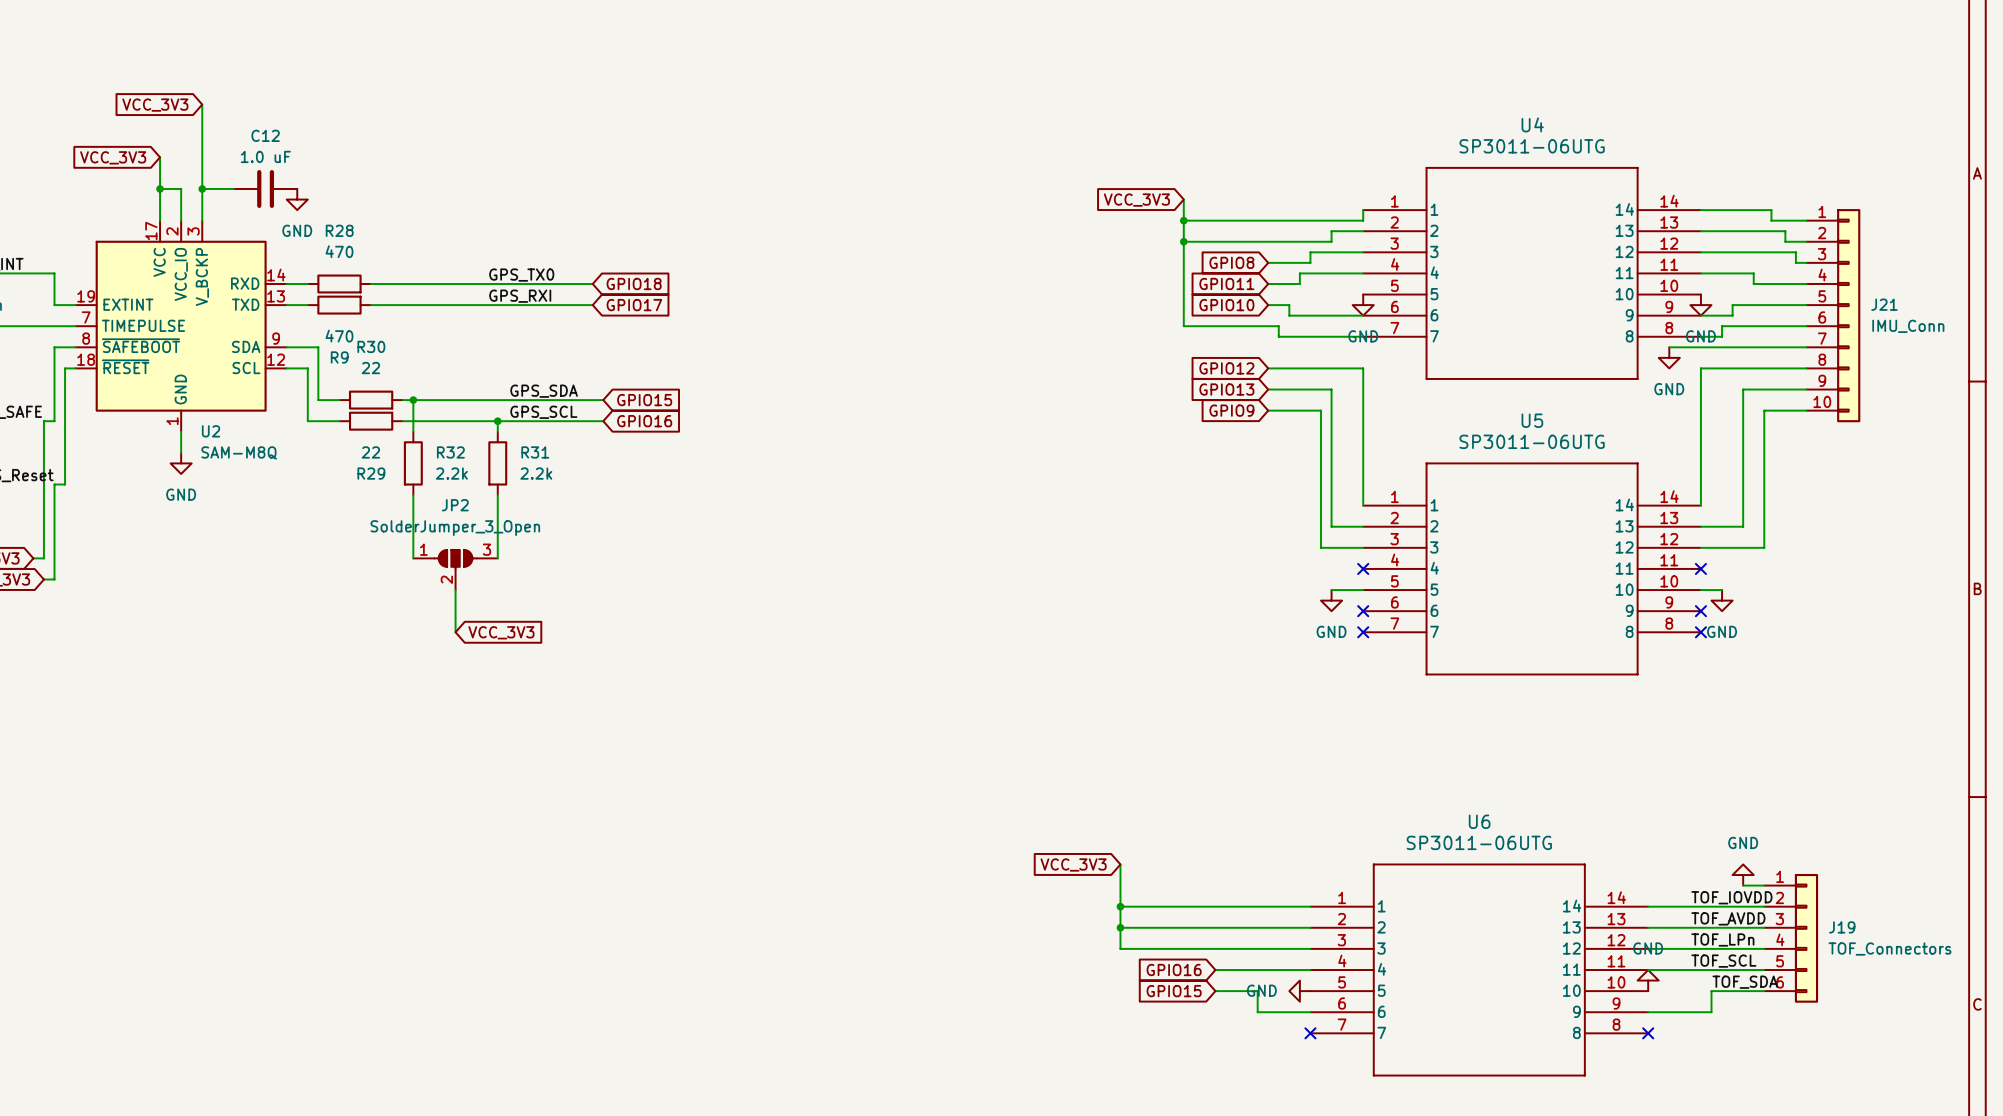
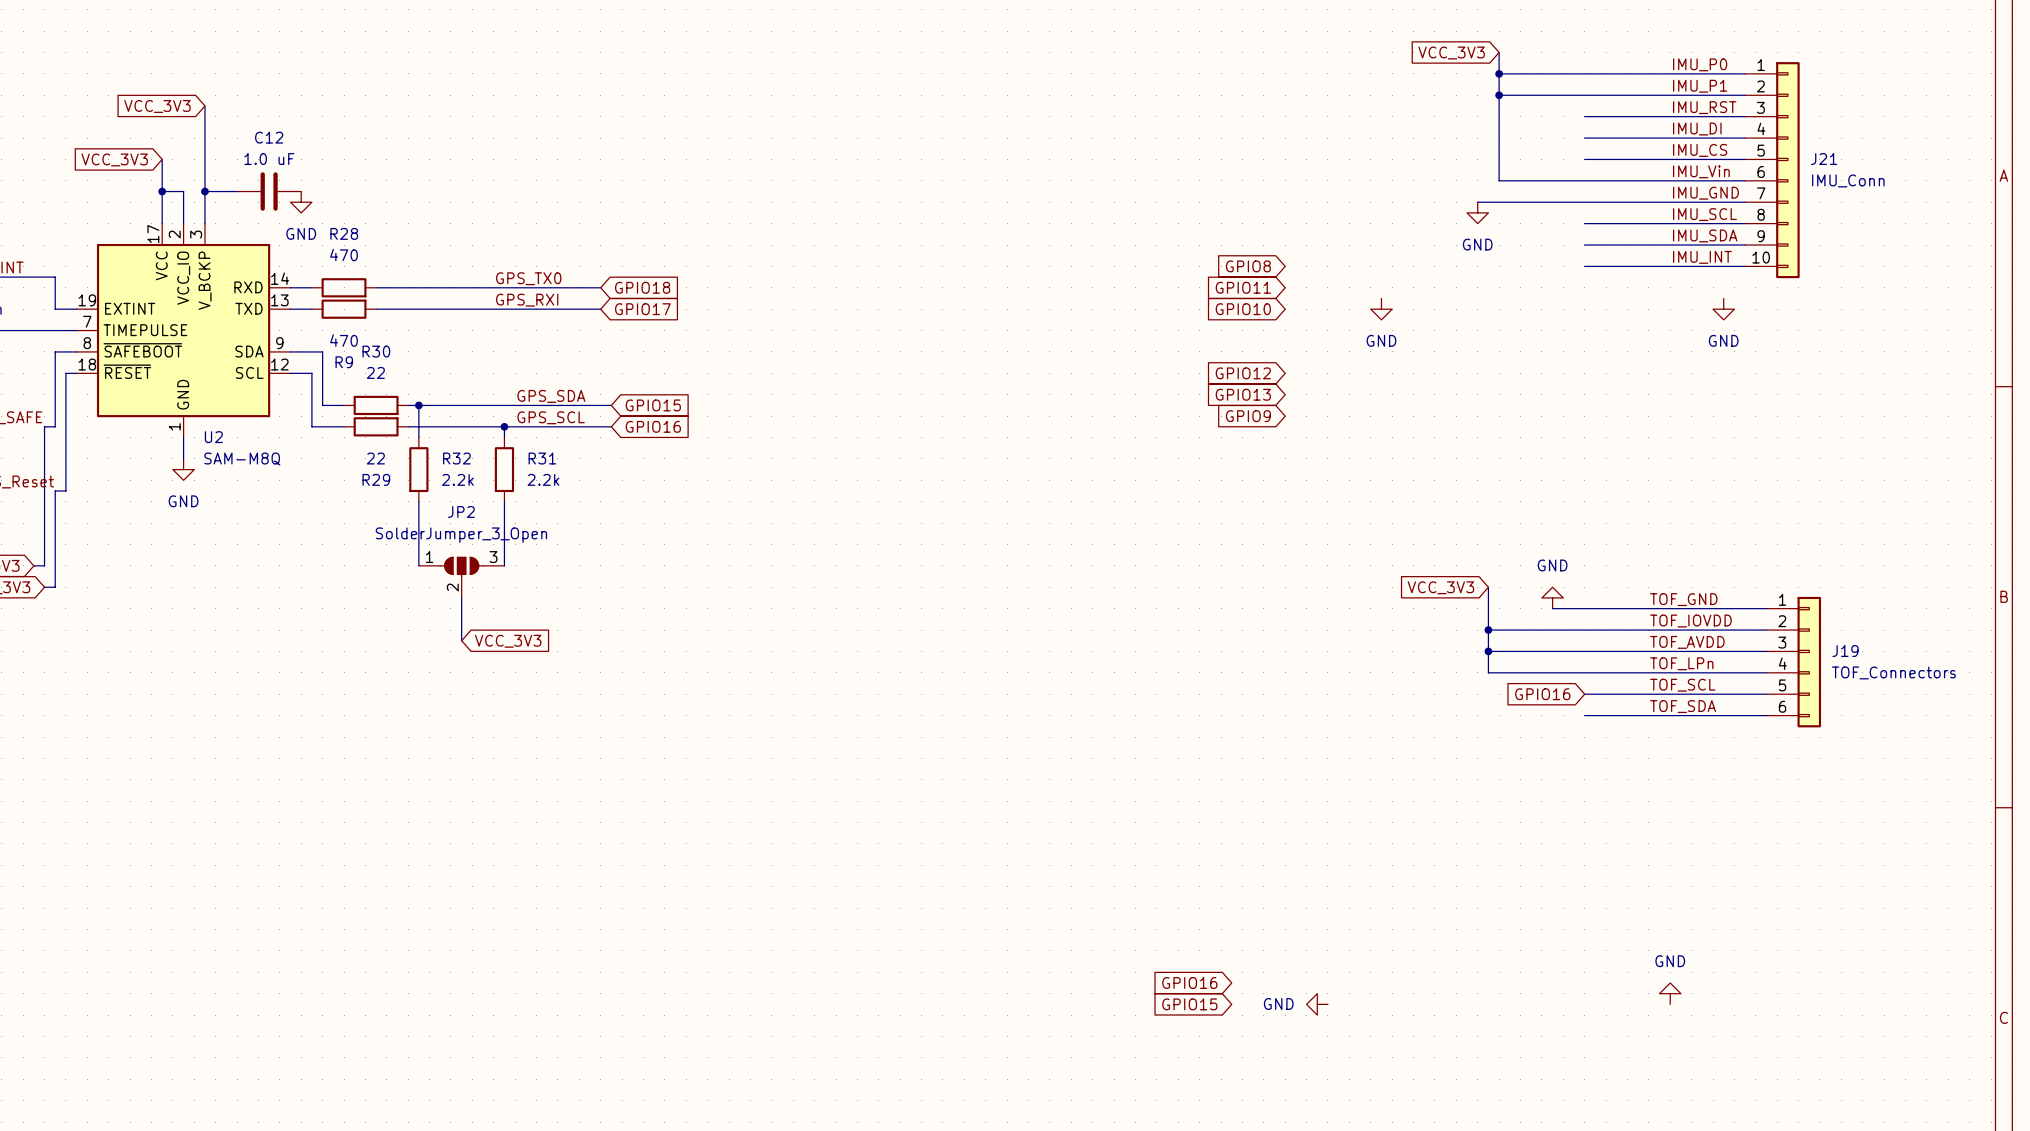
wire: none -> (1499, 52) (1499, 180) (1745, 180)
global label: none -> VCC_3V3 (1451, 53)
label: none -> IMU_P0 (1700, 64)
wire: none -> (1499, 73) (1745, 73)
junction: none -> (1499, 73)
label: none -> IMU_P1 (1700, 86)
wire: none -> (1499, 95) (1745, 95)
junction: none -> (1499, 95)
label: none -> IMU_RST (1704, 107)
wire: none -> (1584, 116) (1745, 116)
label: none -> IMU_DI (1697, 129)
wire: none -> (1584, 138) (1745, 138)
label: none -> IMU_CS (1700, 150)
wire: none -> (1584, 159) (1745, 159)
label: none -> IMU_Vin (1701, 171)
label: none -> IMU_GND (1705, 193)
wire: (1183, 199) (1183, 326) (1278, 326) (1278, 336) (1363, 336) -> none
wire: none -> (1477, 202) (1745, 202)
global label: VCC_3V3 (1136, 200) -> none
wire: (1363, 210) (1363, 220) (1183, 220) -> none
power symbol: none -> GND (1477, 212)
wire: (1700, 210) (1771, 210) (1771, 220) (1806, 220) -> none
label: none -> IMU_SCL (1704, 214)
junction: (1183, 220) -> none
wire: none -> (1584, 223) (1745, 223)
wire: (1363, 231) (1331, 231) (1331, 241) (1183, 241) -> none
wire: (1700, 231) (1785, 231) (1785, 241) (1806, 241) -> none
label: none -> IMU_SDA (1705, 235)
junction: (1183, 241) -> none
wire: none -> (1584, 245) (1745, 245)
wire: (1363, 252) (1310, 252) (1310, 262) (1268, 262) -> none
wire: (1700, 252) (1795, 252) (1795, 262) (1806, 262) -> none
label: none -> IMU_INT (1702, 257)
wire: none -> (1584, 266) (1745, 266)
wire: (1363, 273) (1299, 273) (1299, 283) (1268, 283) -> none
U4: SP3011-06UTG (1532, 273) -> none
wire: (1700, 273) (1753, 273) (1753, 283) (1806, 283) -> none
wire: (1268, 305) (1289, 305) (1289, 315) (1363, 315) -> none
wire: (1806, 305) (1732, 305) (1732, 315) (1700, 315) -> none
J21 position: (1833, 315) -> (1772, 170)
wire: (1806, 326) (1722, 326) (1722, 336) (1700, 336) -> none
wire: (1669, 347) (1806, 347) -> none
power symbol: GND (1669, 357) -> none
wire: (1268, 368) (1363, 368) (1363, 505) -> none
wire: (1806, 368) (1700, 368) (1700, 505) -> none
wire: (1268, 389) (1331, 389) (1331, 526) (1363, 526) -> none
wire: (1806, 389) (1743, 389) (1743, 526) (1700, 526) -> none
wire: (1268, 410) (1321, 410) (1321, 547) (1363, 547) -> none
wire: (1806, 410) (1764, 410) (1764, 547) (1700, 547) -> none
no-connect mark: (1363, 568) -> none
U5: SP3011-06UTG (1532, 568) -> none
no-connect mark: (1700, 568) -> none
wire: none -> (1488, 587) (1488, 672) (1766, 672)
global label: none -> VCC_3V3 (1440, 587)
wire: (1331, 590) (1363, 590) -> none
power symbol: none -> GND (1552, 597)
wire: (1700, 590) (1722, 590) -> none
label: none -> TOF_GND (1683, 599)
power symbol: GND (1331, 600) -> none
wire: none -> (1552, 608) (1766, 608)
power symbol: GND (1722, 600) -> none
no-connect mark: (1363, 611) -> none
no-connect mark: (1700, 611) -> none
label: none -> TOF_IOVDD (1690, 621)
wire: none -> (1488, 630) (1766, 630)
junction: none -> (1488, 630)
no-connect mark: (1363, 632) -> none
no-connect mark: (1700, 632) -> none
label: none -> TOF_AVDD (1687, 642)
wire: none -> (1488, 651) (1766, 651)
junction: none -> (1488, 651)
label: none -> TOF_LPn (1681, 663)
label: none -> TOF_SCL (1682, 685)
global label: none -> GPIO16 (1542, 694)
wire: none -> (1584, 694) (1766, 694)
label: none -> TOF_SDA (1683, 706)
wire: none -> (1584, 715) (1766, 715)
global label: VCC_3V3 (1073, 864) -> none
wire: (1120, 864) (1120, 948) (1310, 948) -> none
power symbol: GND (1743, 875) -> none
wire: (1743, 885) (1764, 885) -> none
label: TOF_IOVDD (1731, 897) -> none
wire: (1120, 906) (1310, 906) -> none
junction: (1120, 906) -> none
wire: (1648, 906) (1764, 906) -> none
label: TOF_AVDD (1728, 918) -> none
wire: (1120, 927) (1310, 927) -> none
junction: (1120, 927) -> none
wire: (1648, 927) (1764, 927) -> none
J19 position: (1791, 938) -> (1793, 662)
label: TOF_LPn (1722, 939) -> none
wire: (1648, 948) (1764, 948) -> none
label: TOF_SCL (1723, 961) -> none
wire: (1215, 970) (1310, 970) -> none
U6: SP3011-06UTG (1479, 970) -> none
wire: (1648, 970) (1764, 970) -> none
label: TOF_SDA (1745, 982) -> none
wire: (1215, 991) (1257, 991) (1257, 1012) (1310, 1012) -> none
wire: (1764, 991) (1711, 991) (1711, 1012) (1648, 1012) -> none
no-connect mark: (1310, 1033) -> none
no-connect mark: (1648, 1033) -> none

